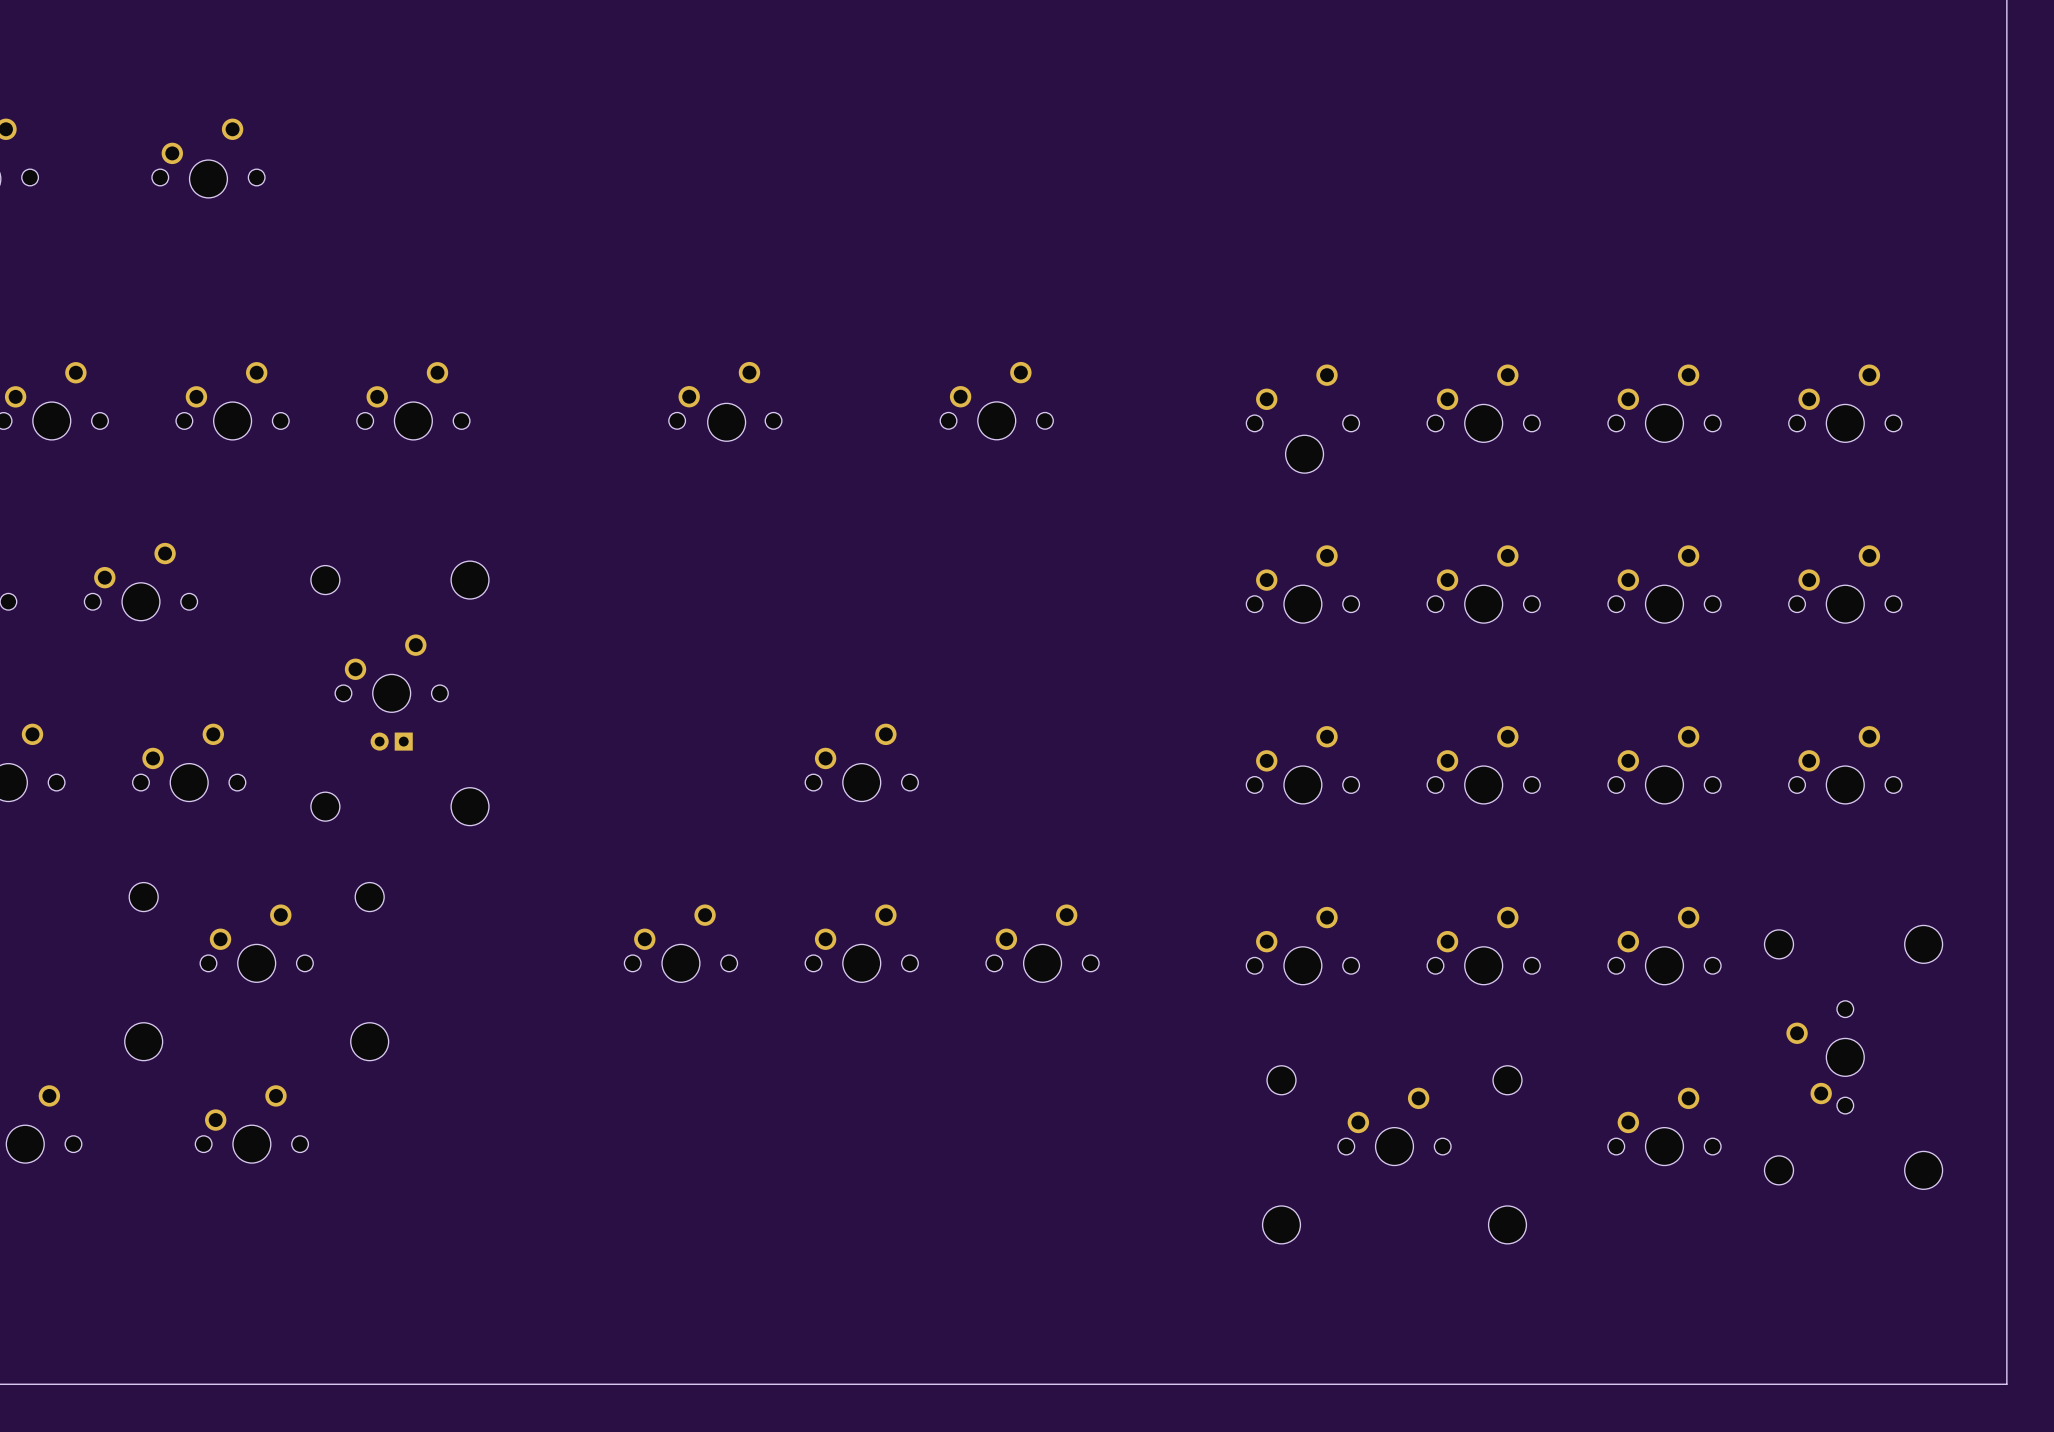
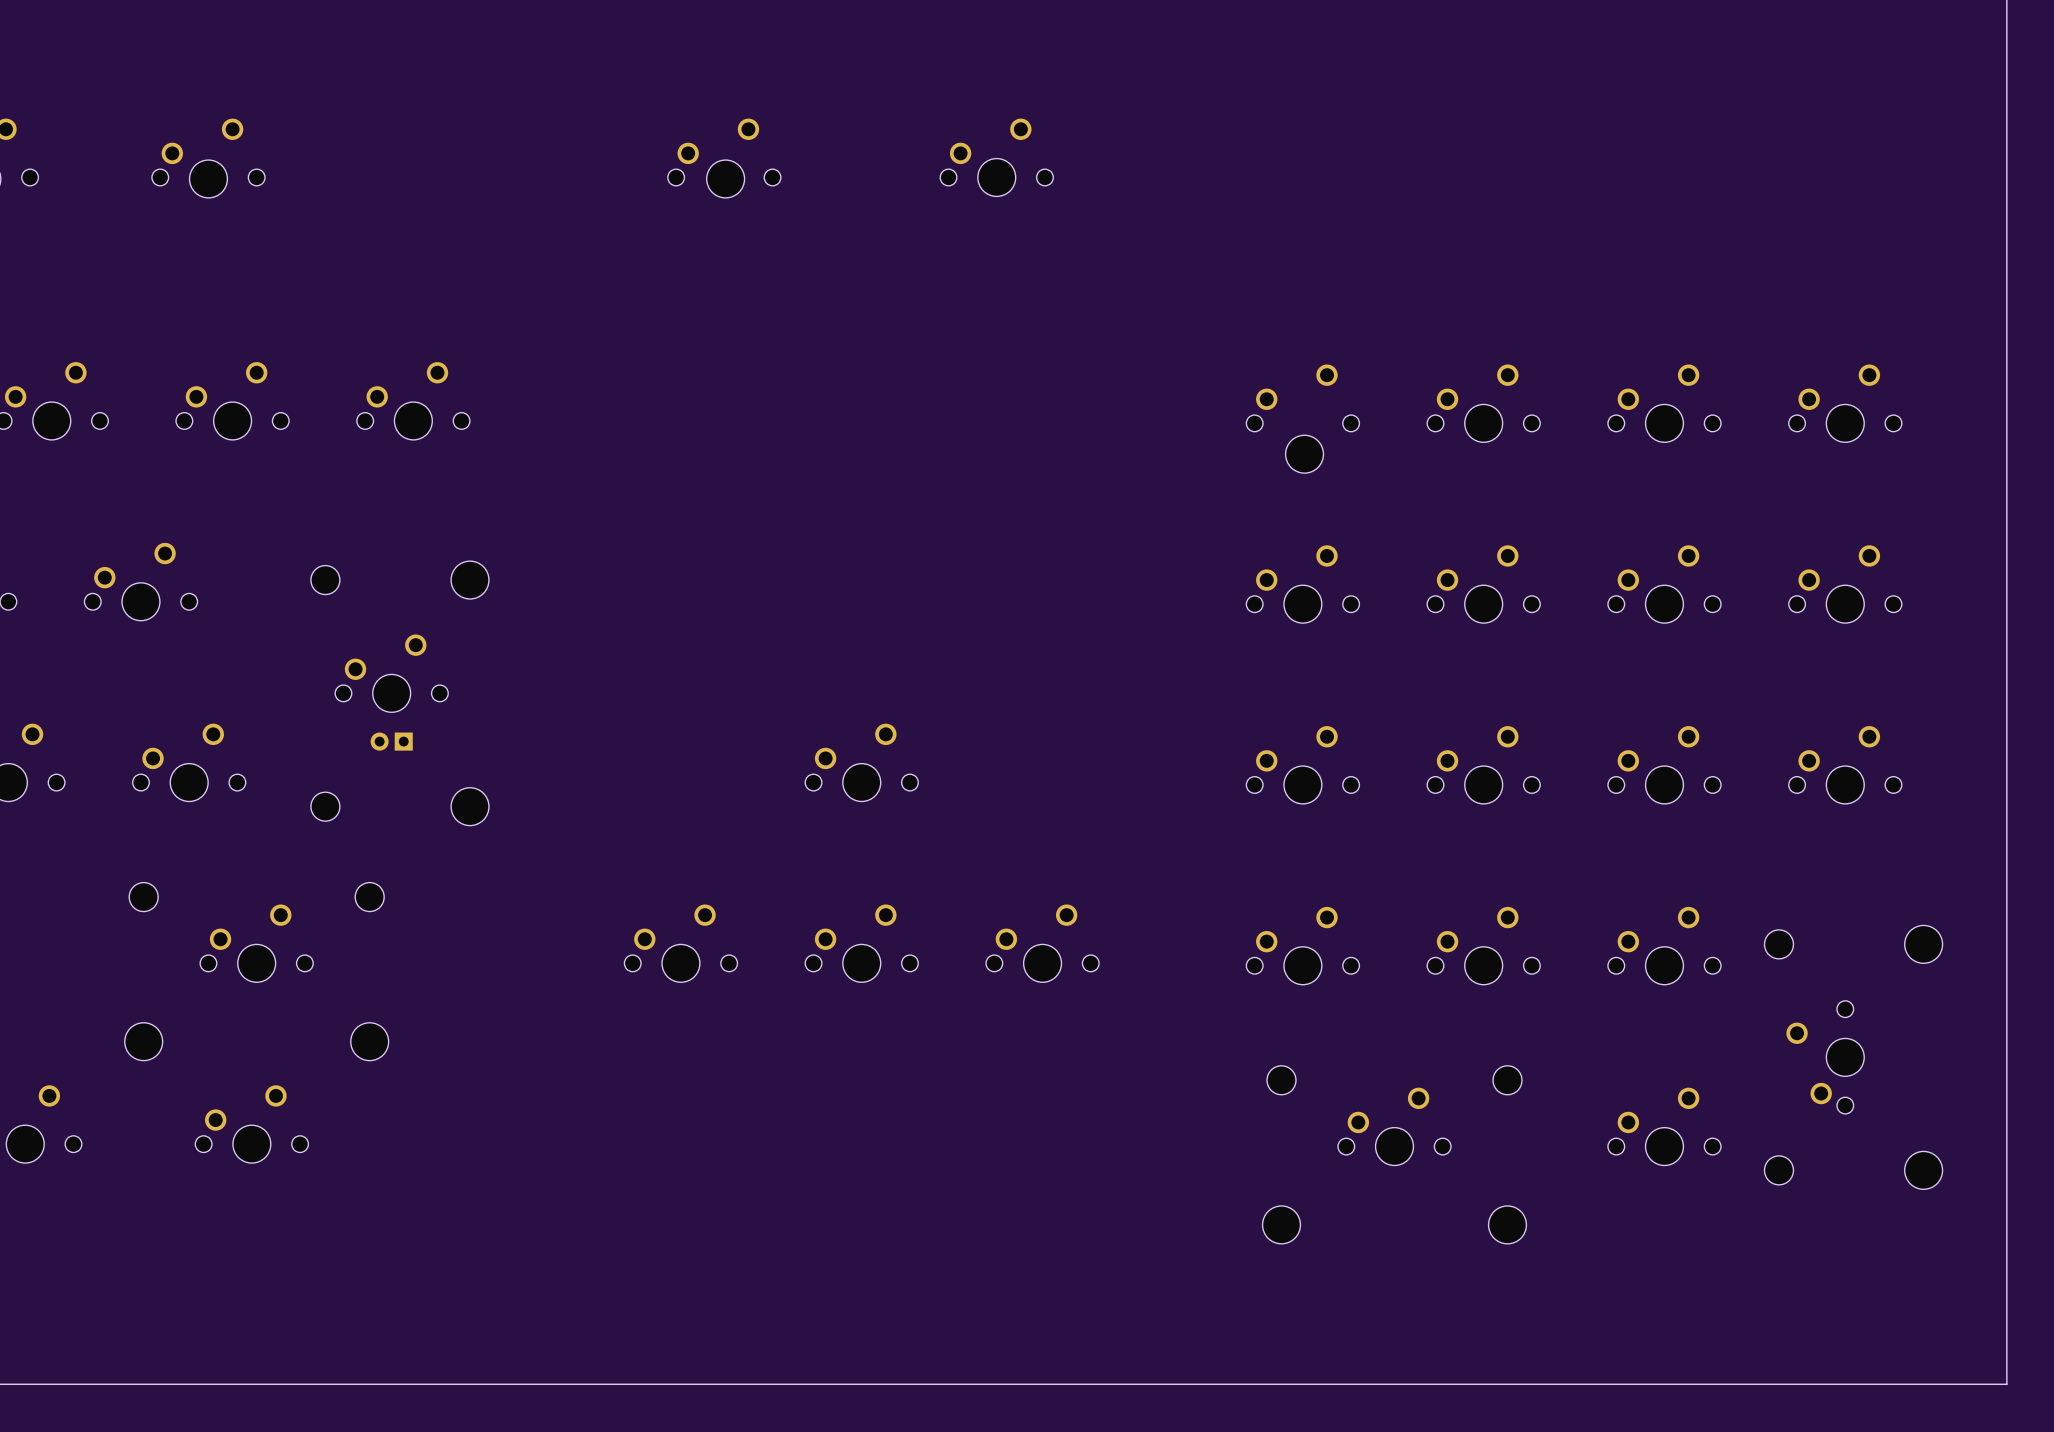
part: none -> (996, 157)
part: none -> (724, 158)
part: (996, 400) -> none
part: (725, 401) -> none

